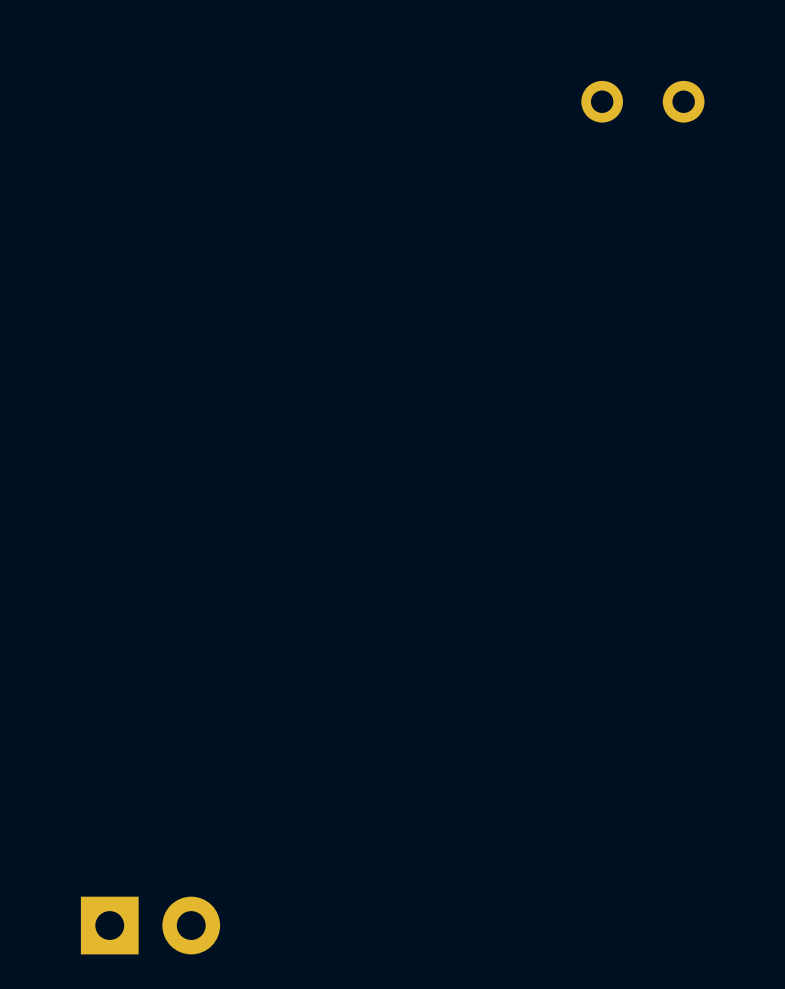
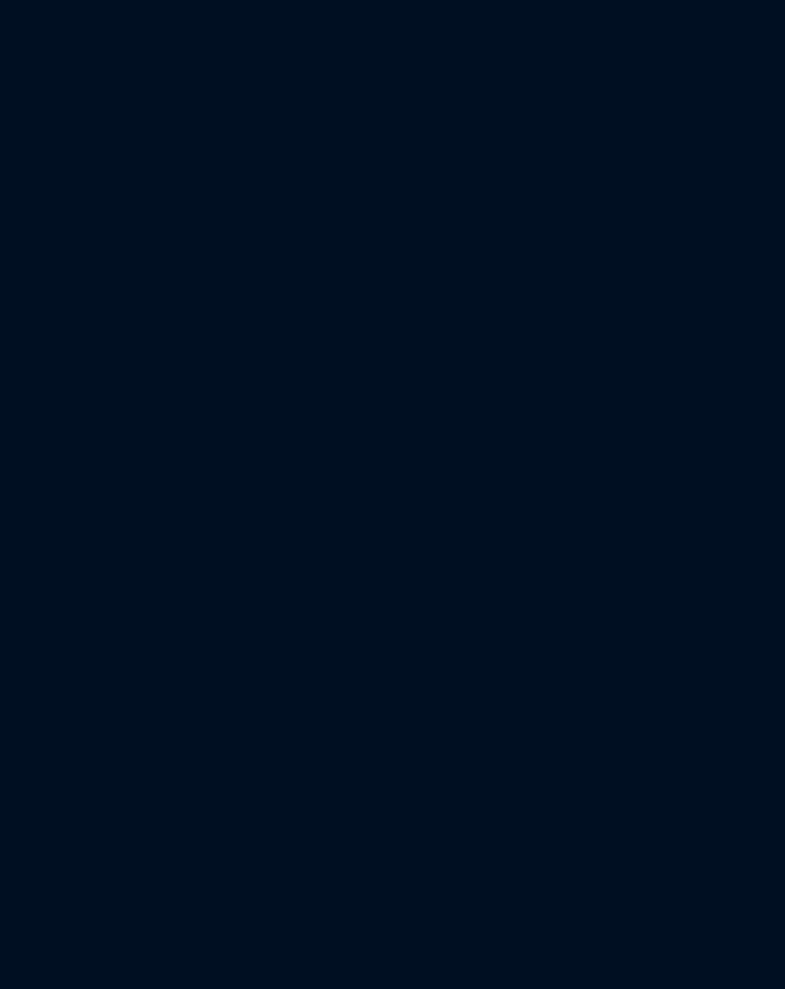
part: (642, 101) -> none
part: (150, 925) -> none

